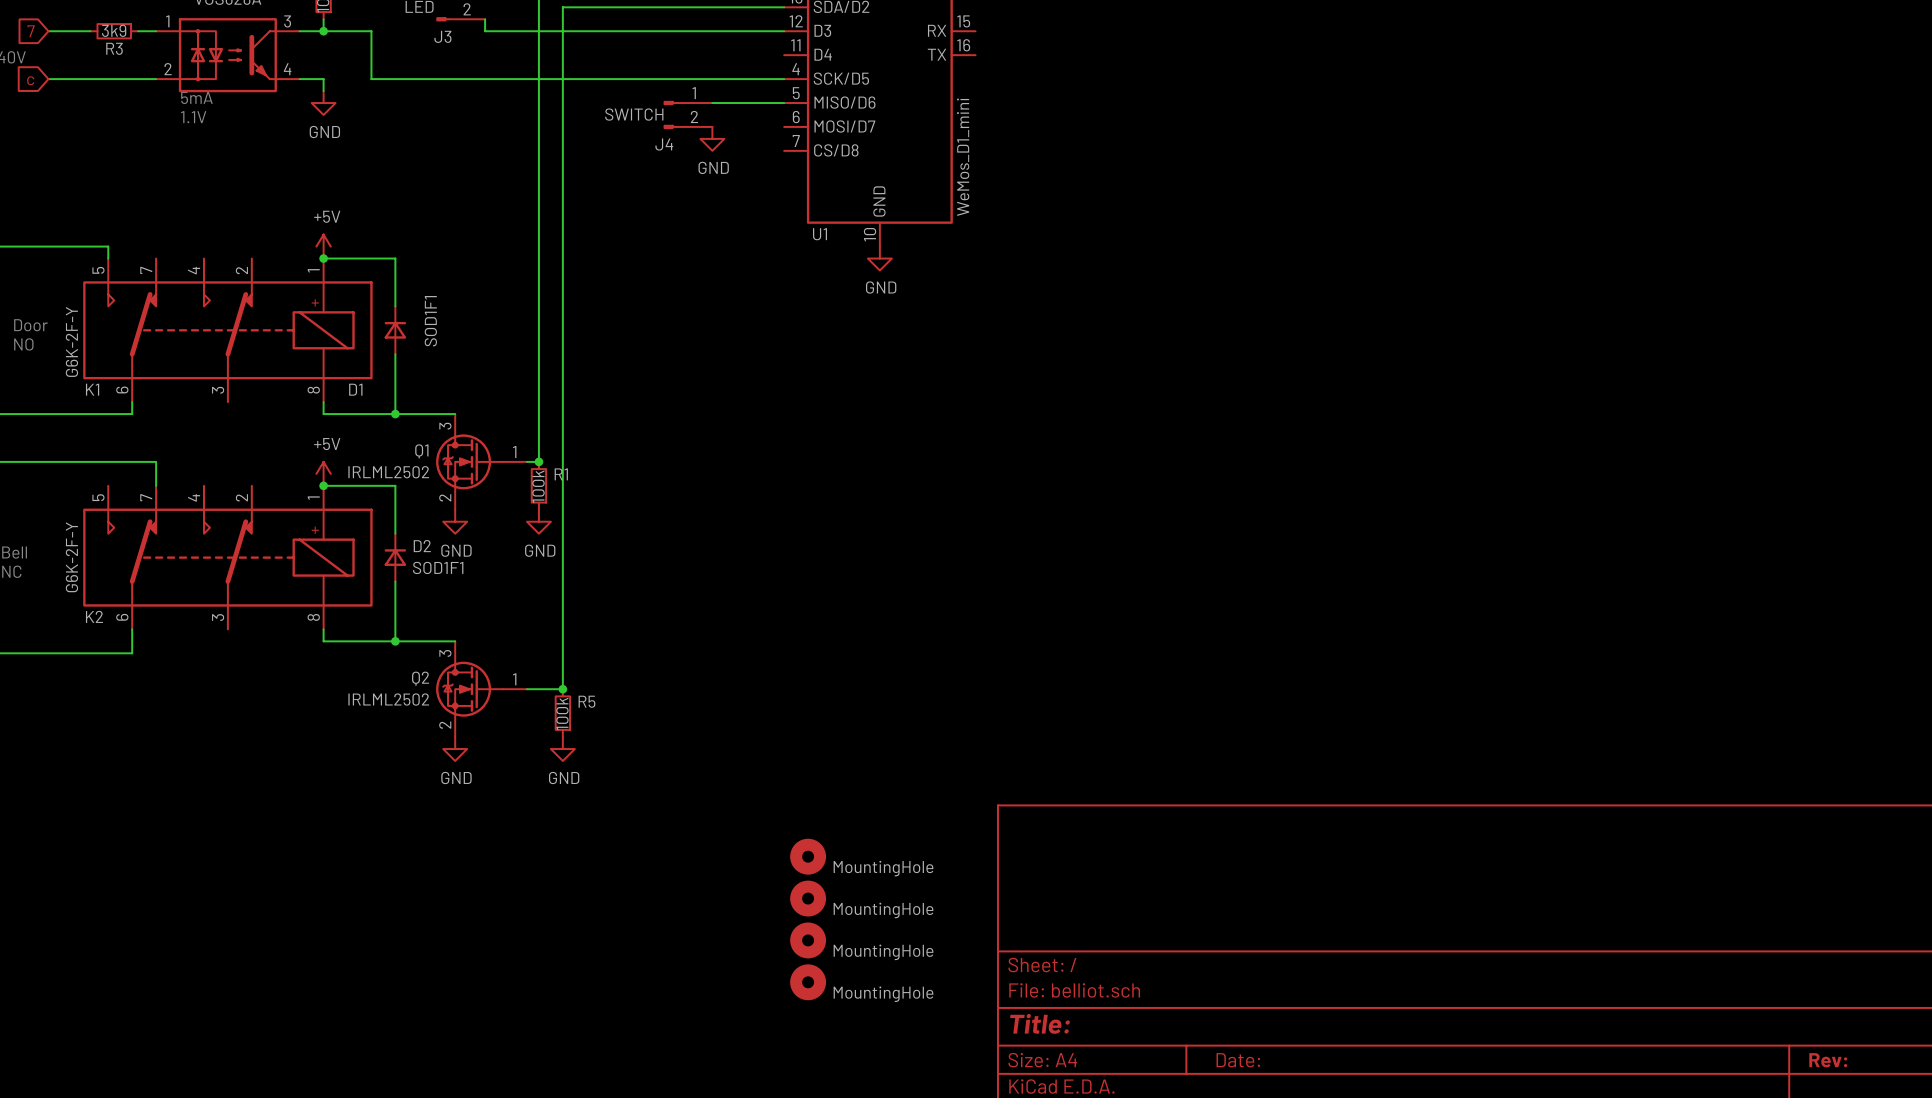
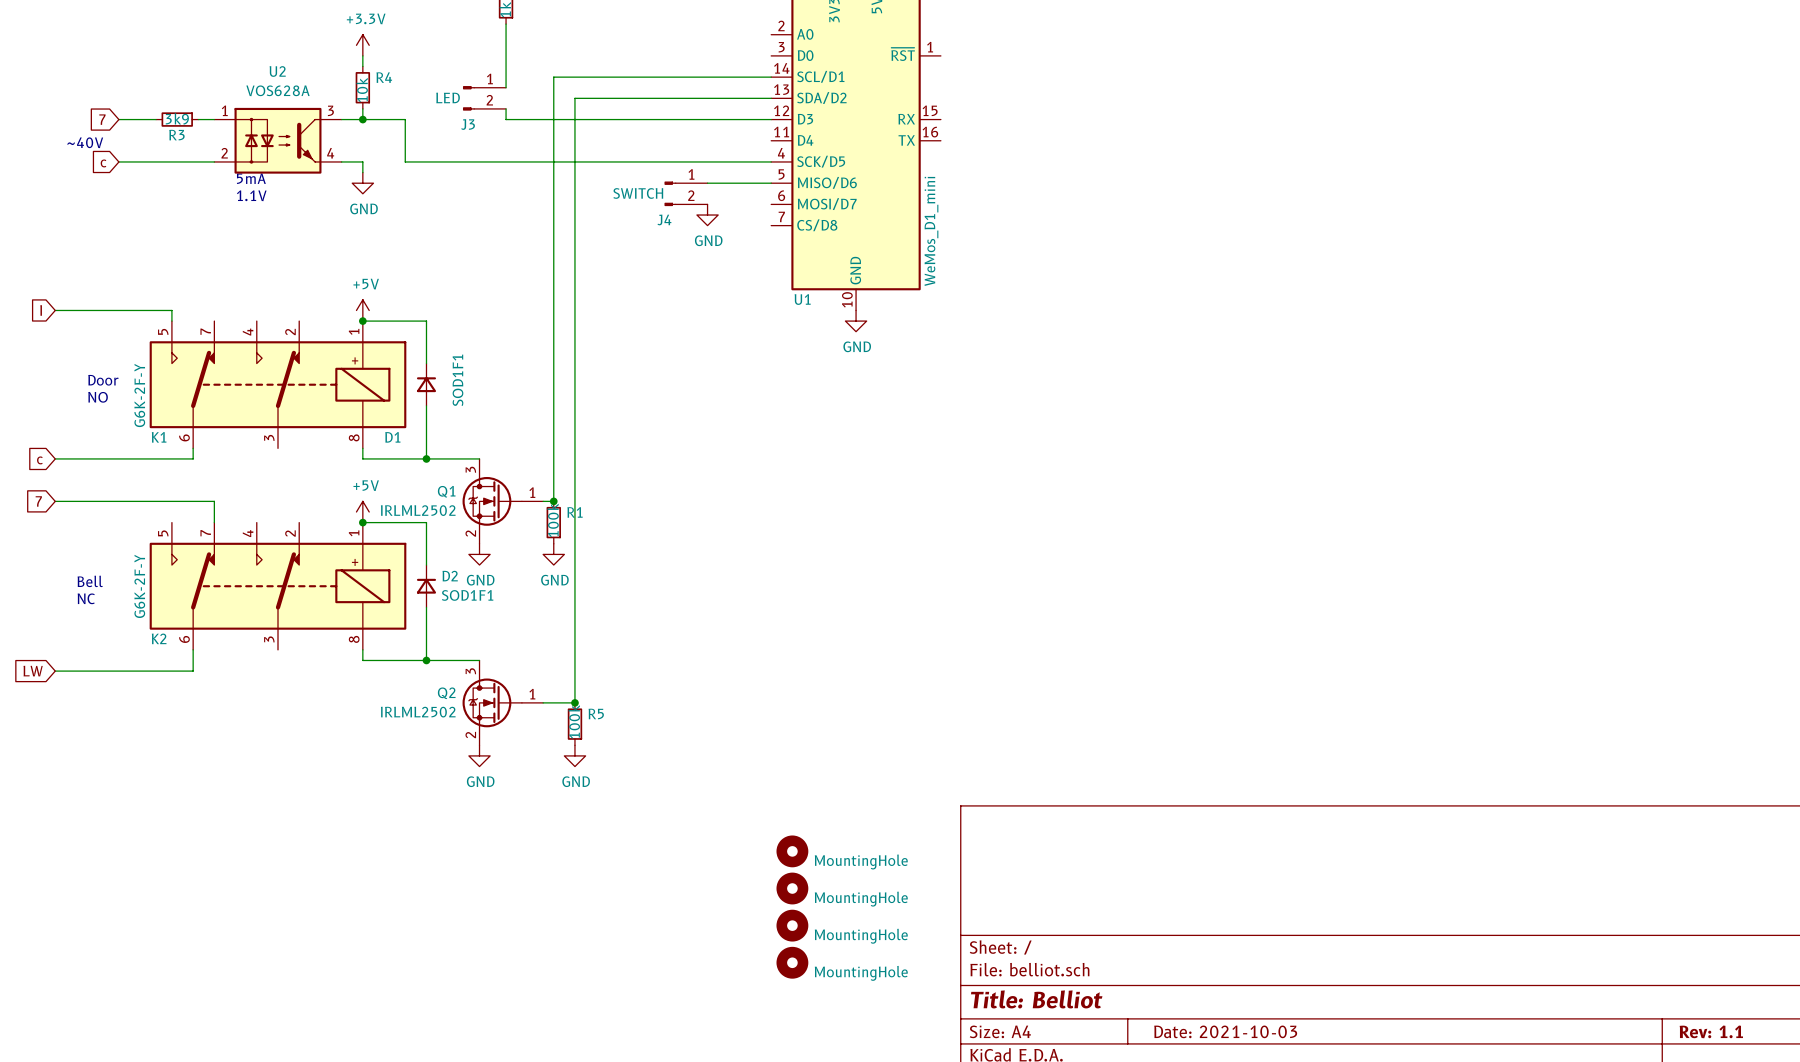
title block: Title: (1040, 1023) -> Title: Belliot (1036, 999)
title block: Date: (1238, 1060) -> Date: 2021-10-03 (1225, 1031)
title block: Rev: (1828, 1060) -> Rev: 1.1 (1711, 1031)

